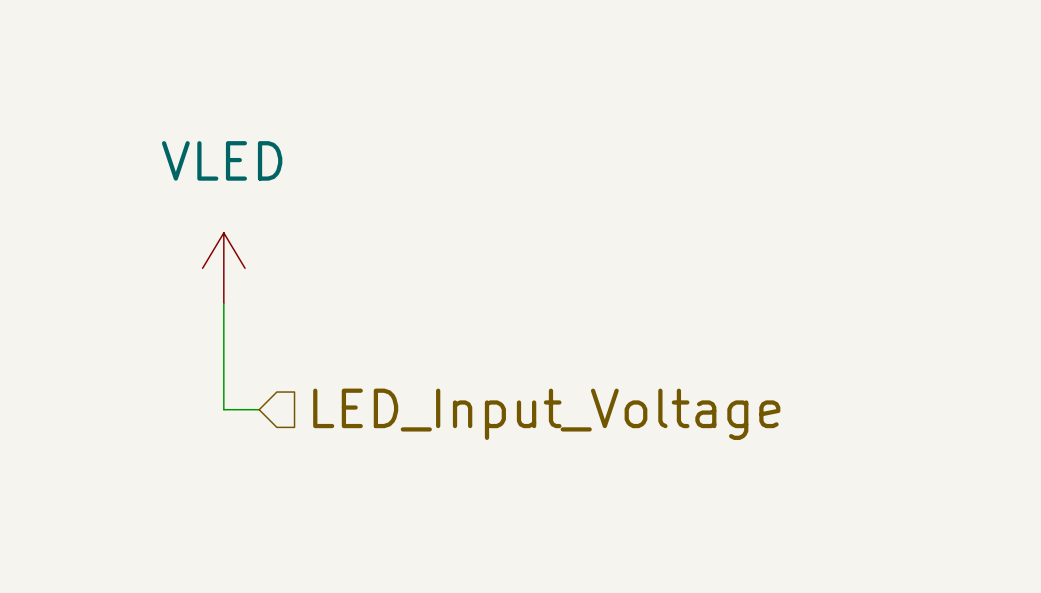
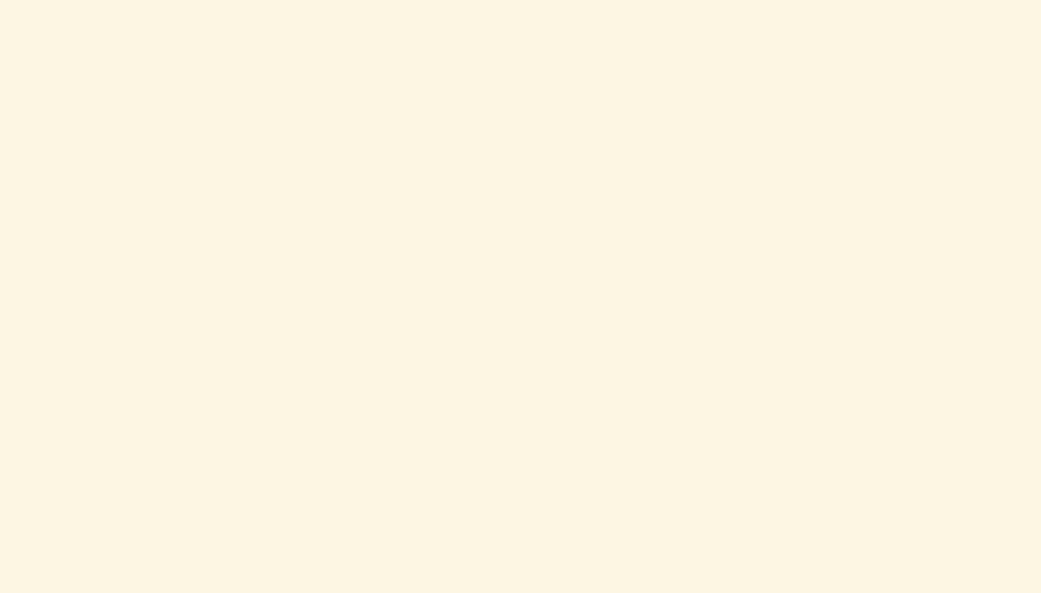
power symbol: VLED (223, 268) -> none
wire: (223, 303) (223, 409) (259, 409) -> none
hierarchical label: LED_Input_Voltage (546, 414) -> none

